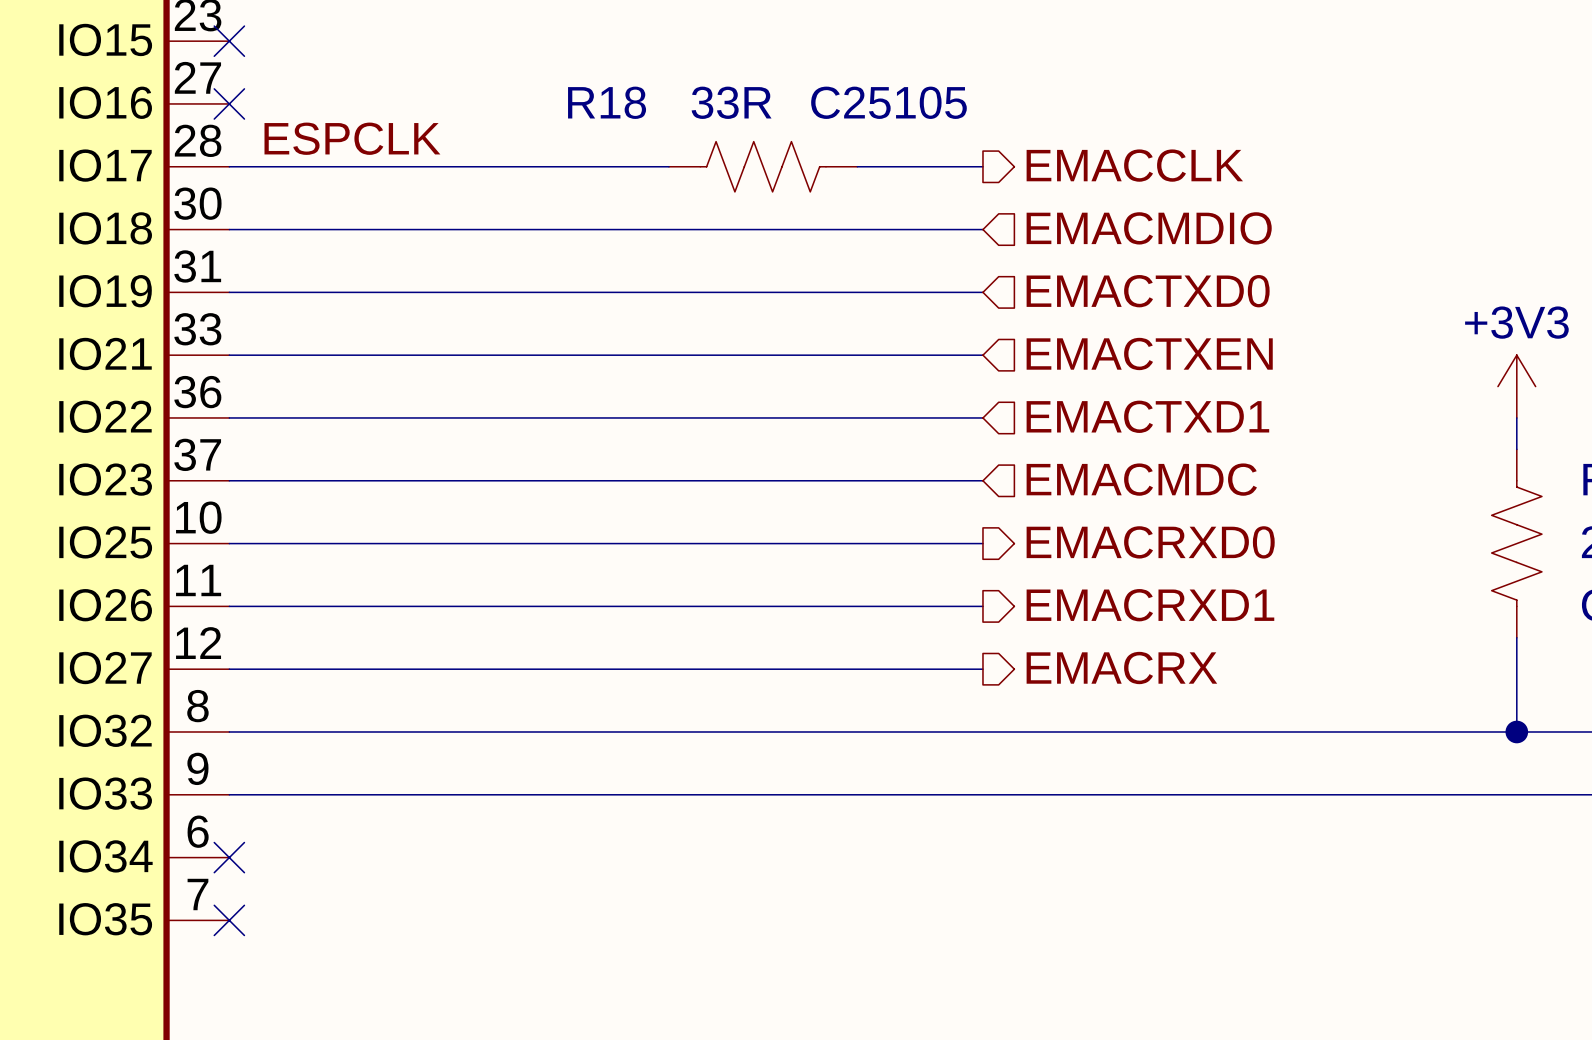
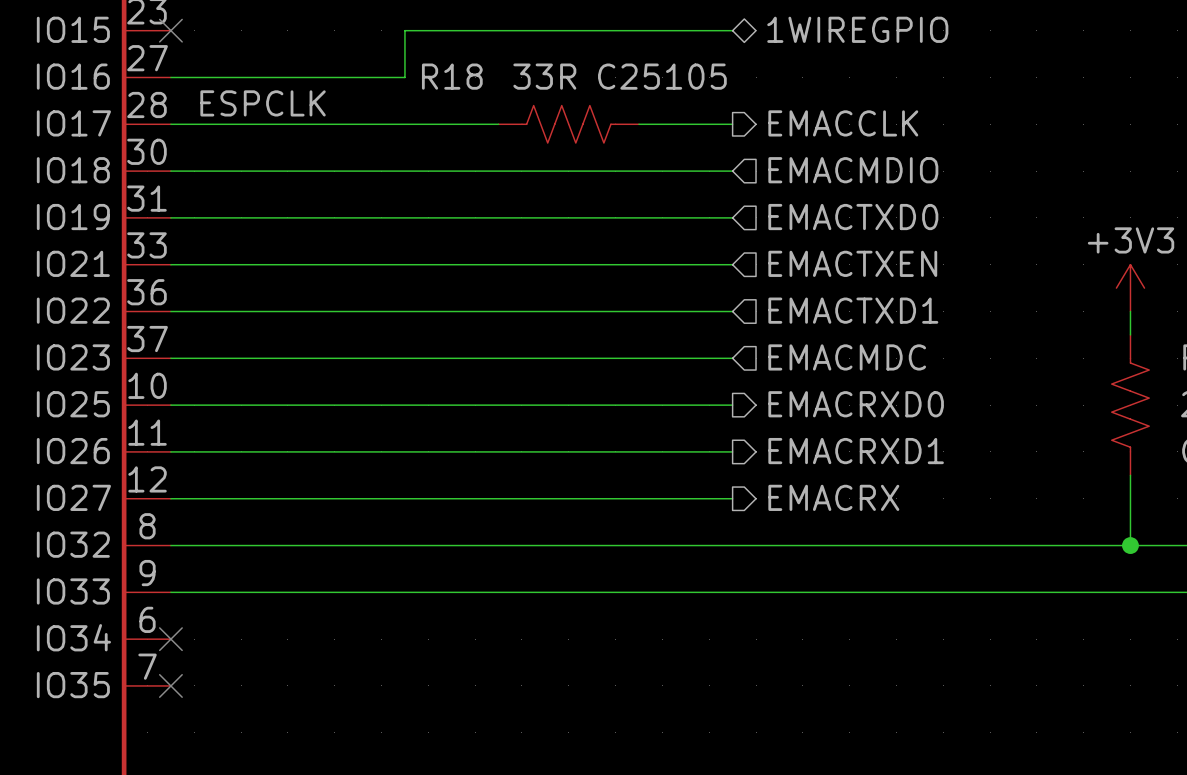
hierarchical label: none -> 1WIREGPIO (857, 29)
wire: none -> (732, 30) (404, 30) (404, 77) (170, 77)
no-connect mark: (229, 103) -> none

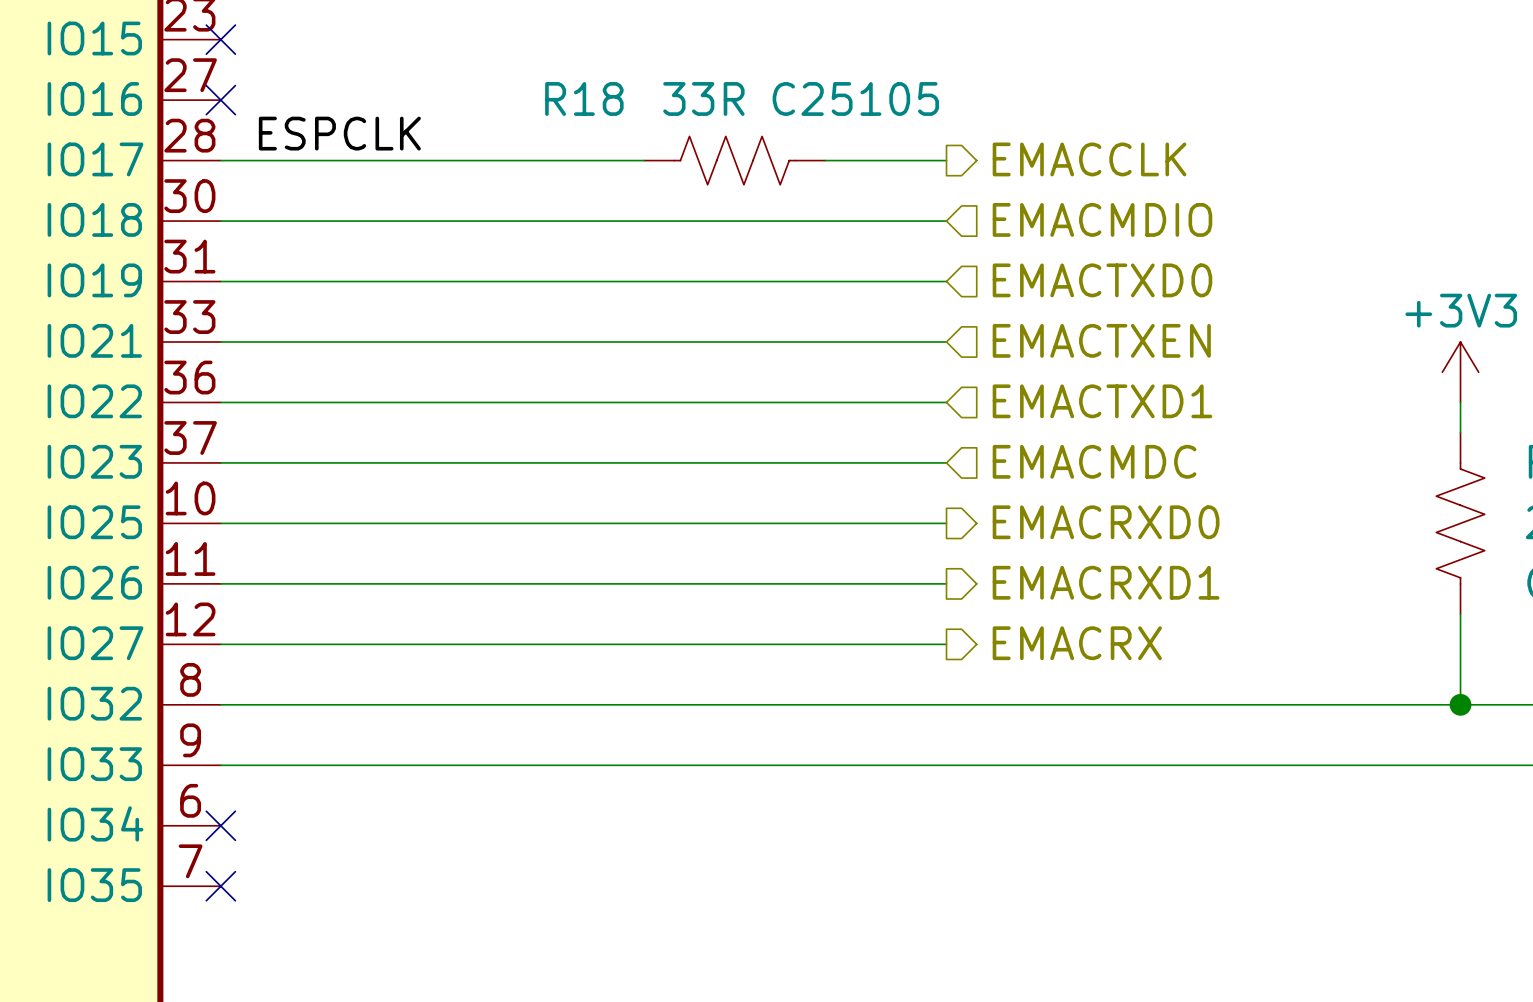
hierarchical label: 1WIREGPIO (857, 29) -> none
wire: (732, 30) (404, 30) (404, 77) (170, 77) -> none
no-connect mark: none -> (220, 100)

